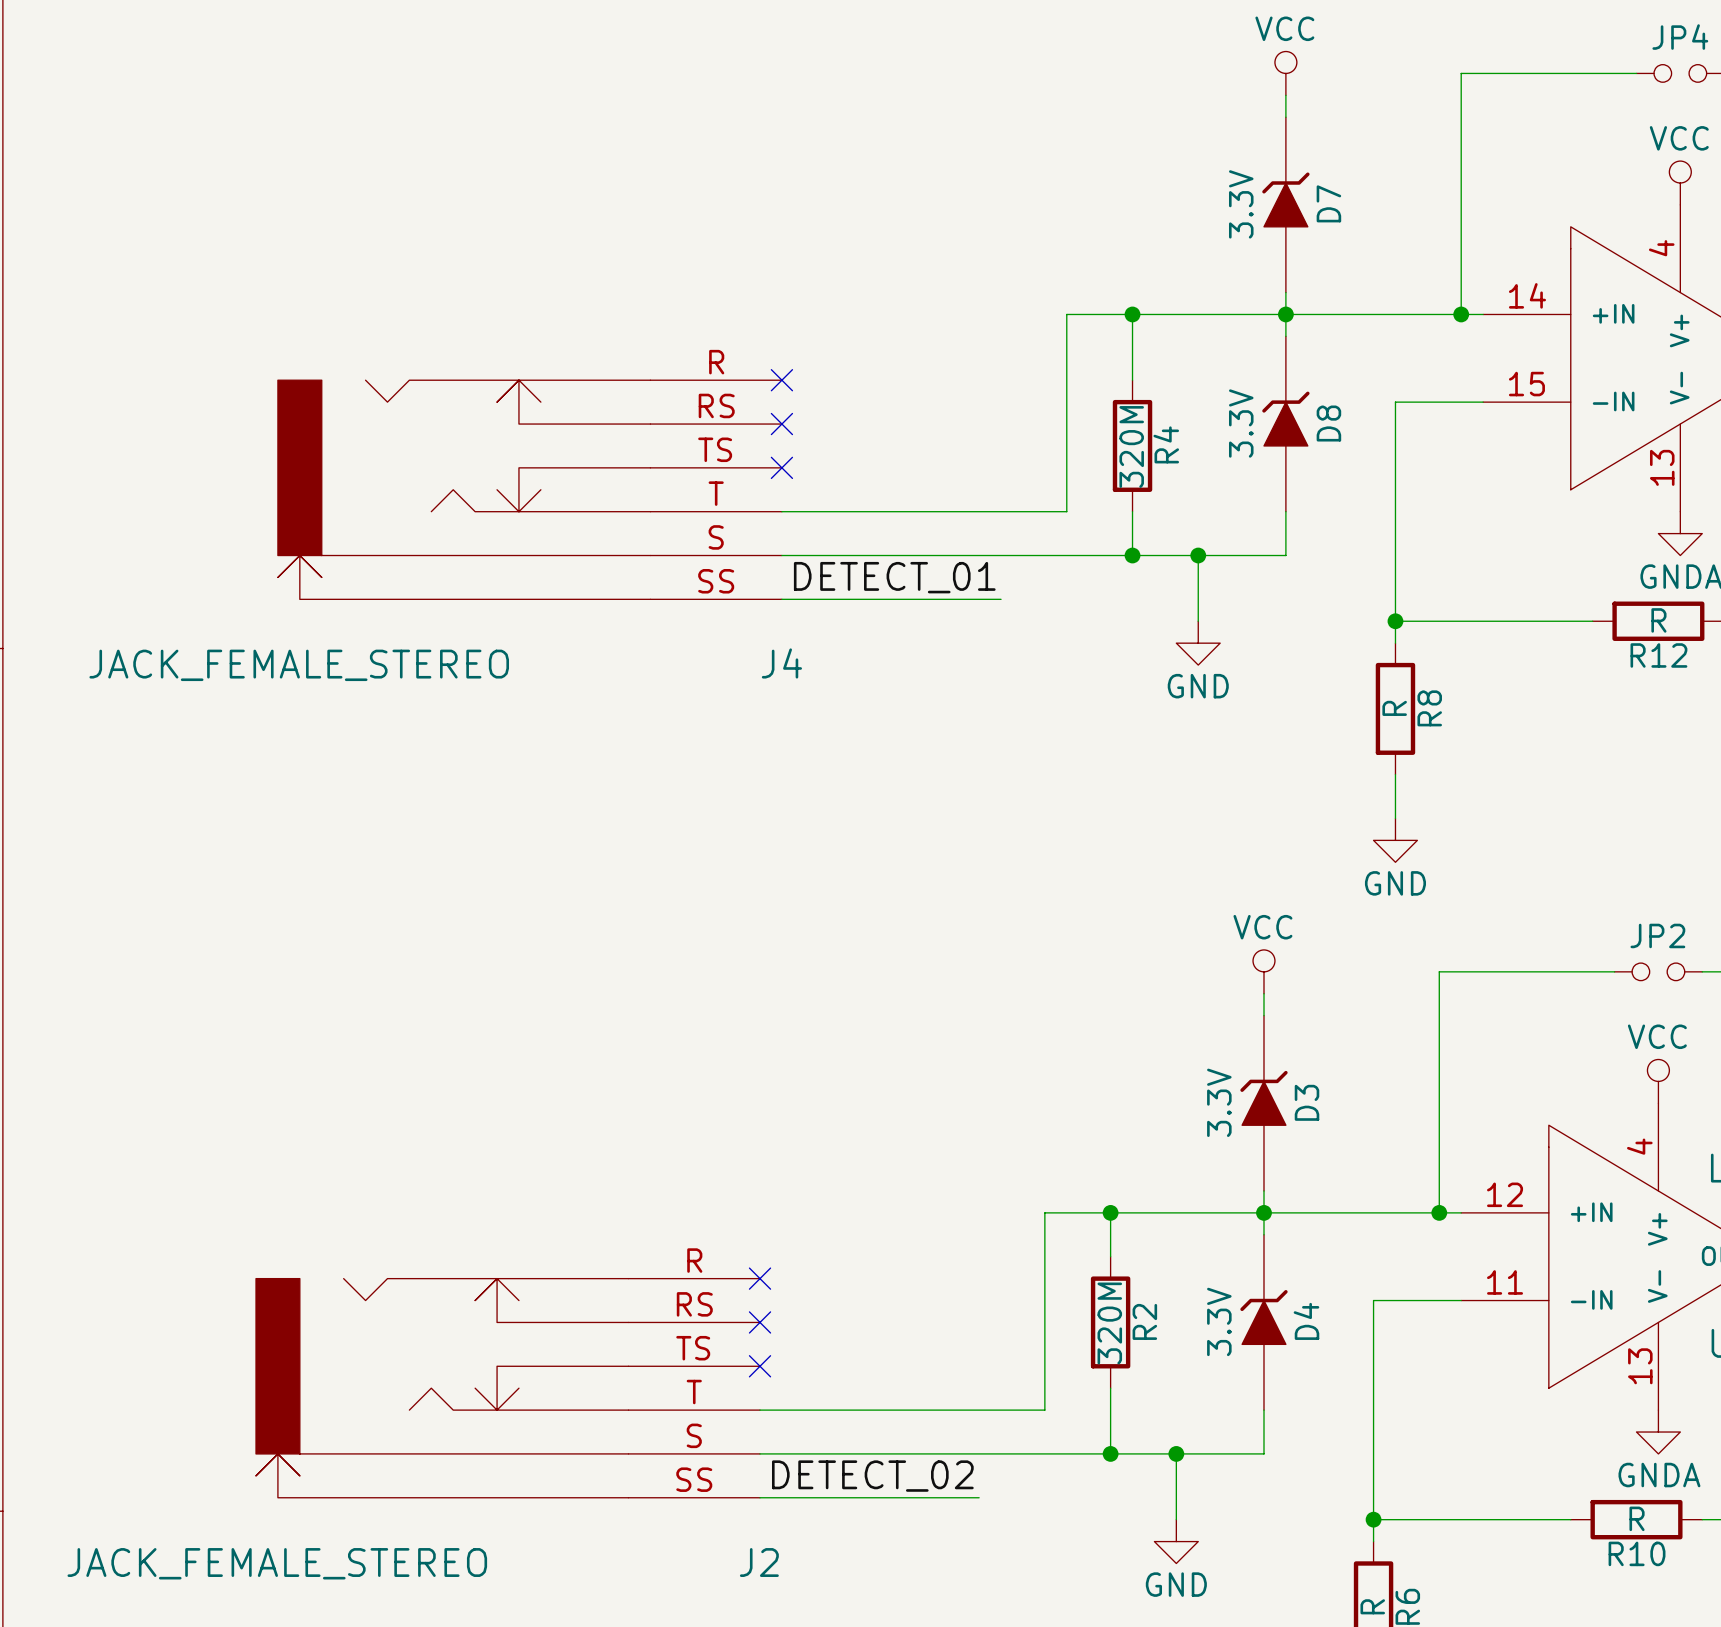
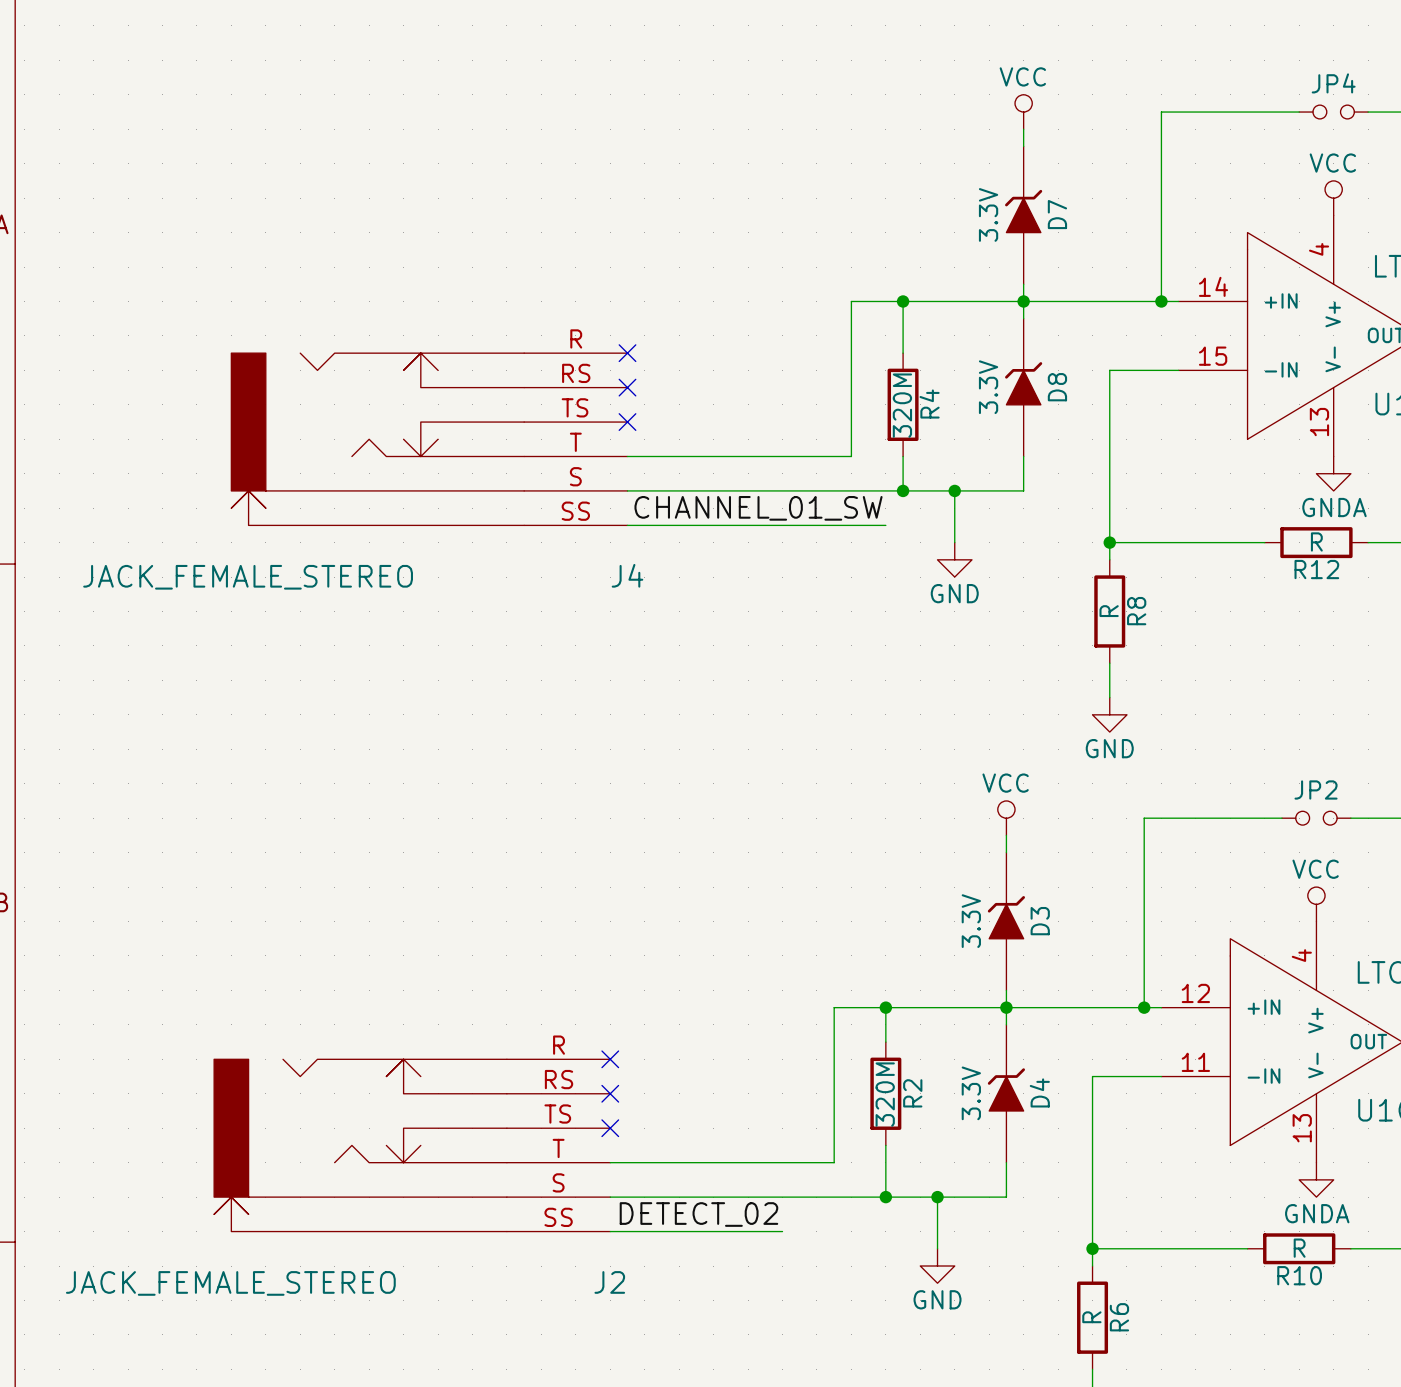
label: DETECT_01 (894, 577) -> none
label: none -> CHANNEL_01_SW (758, 508)
wire: none -> (799, 525) (885, 525)

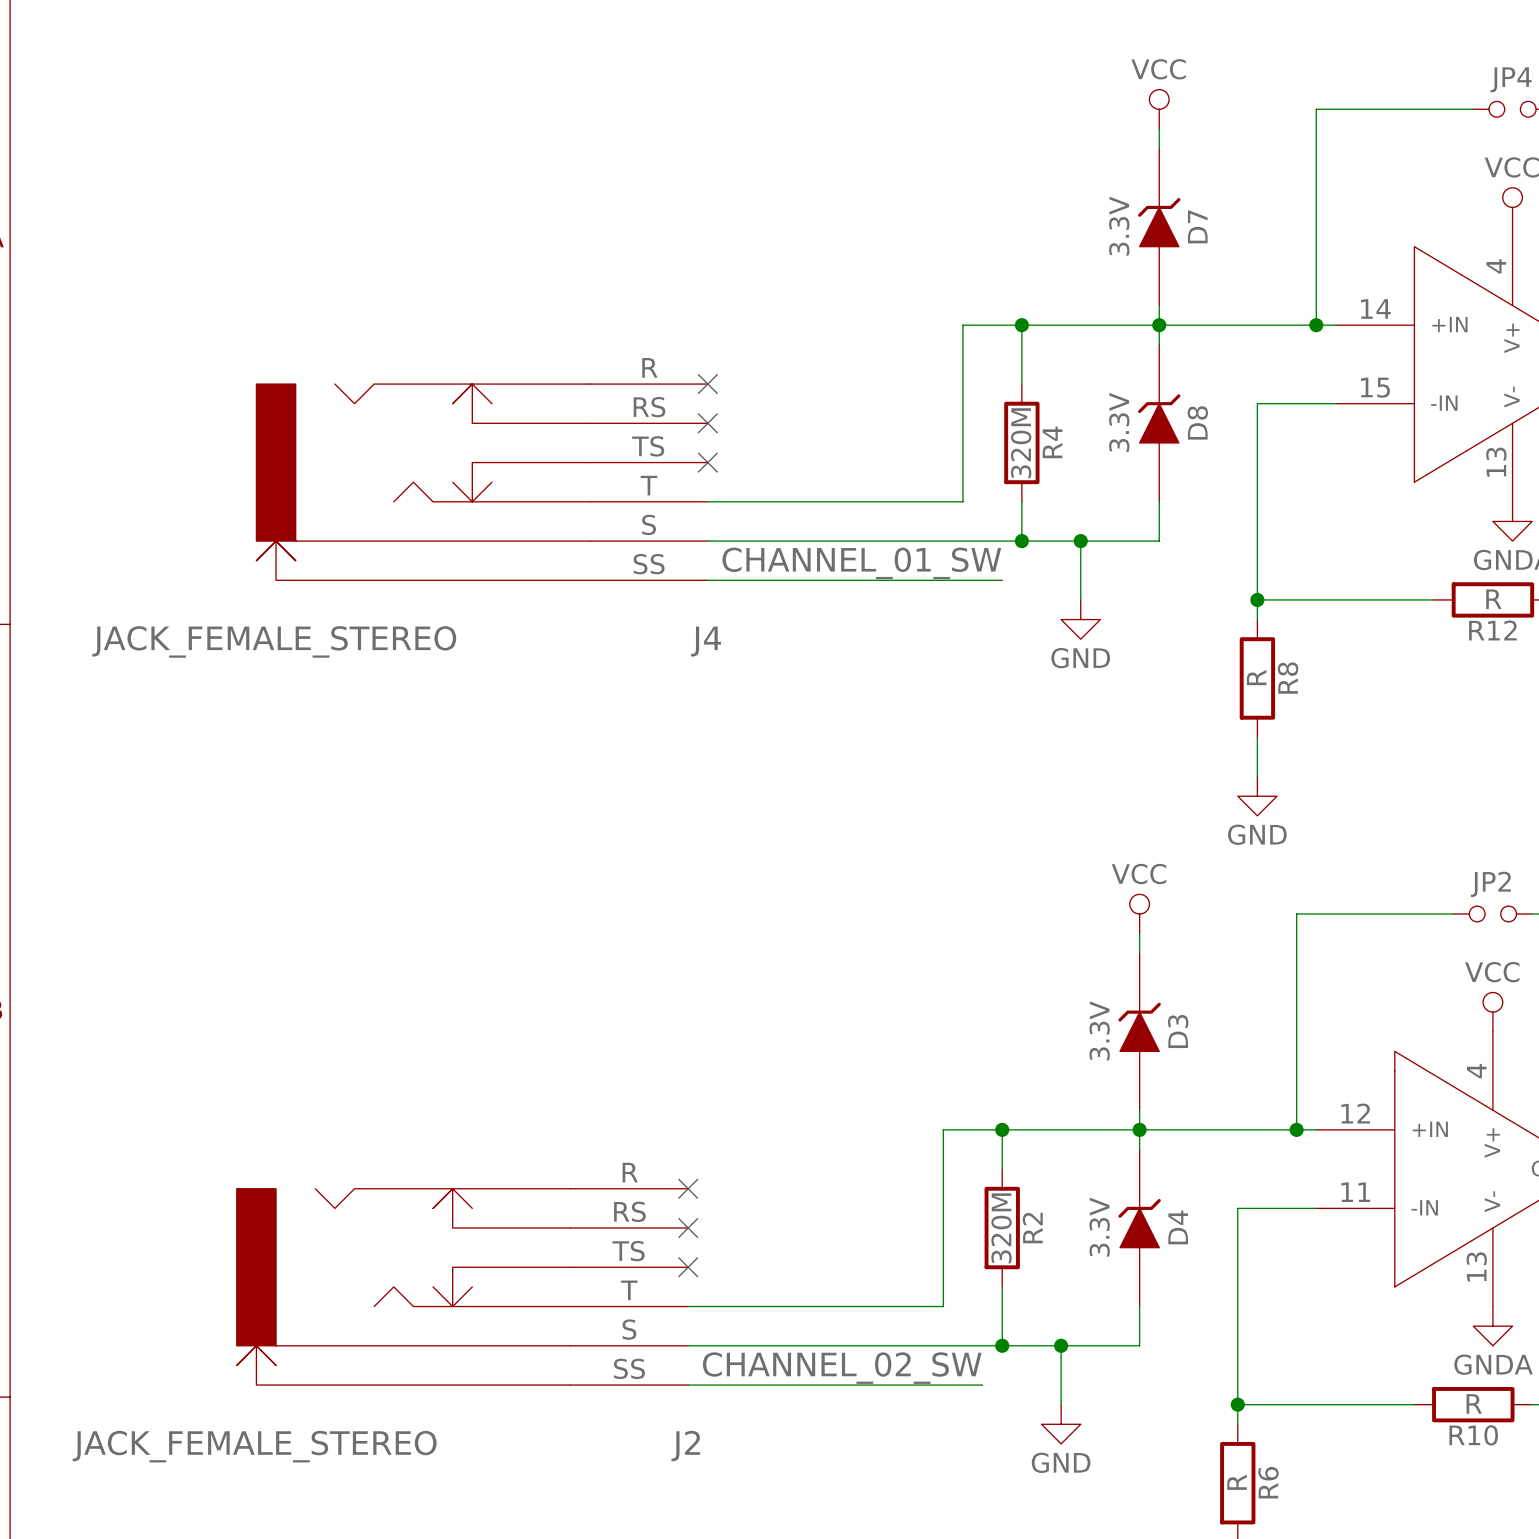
label: DETECT_02 (698, 1214) -> none
label: none -> CHANNEL_02_SW (842, 1368)
wire: none -> (884, 1385) (982, 1385)

